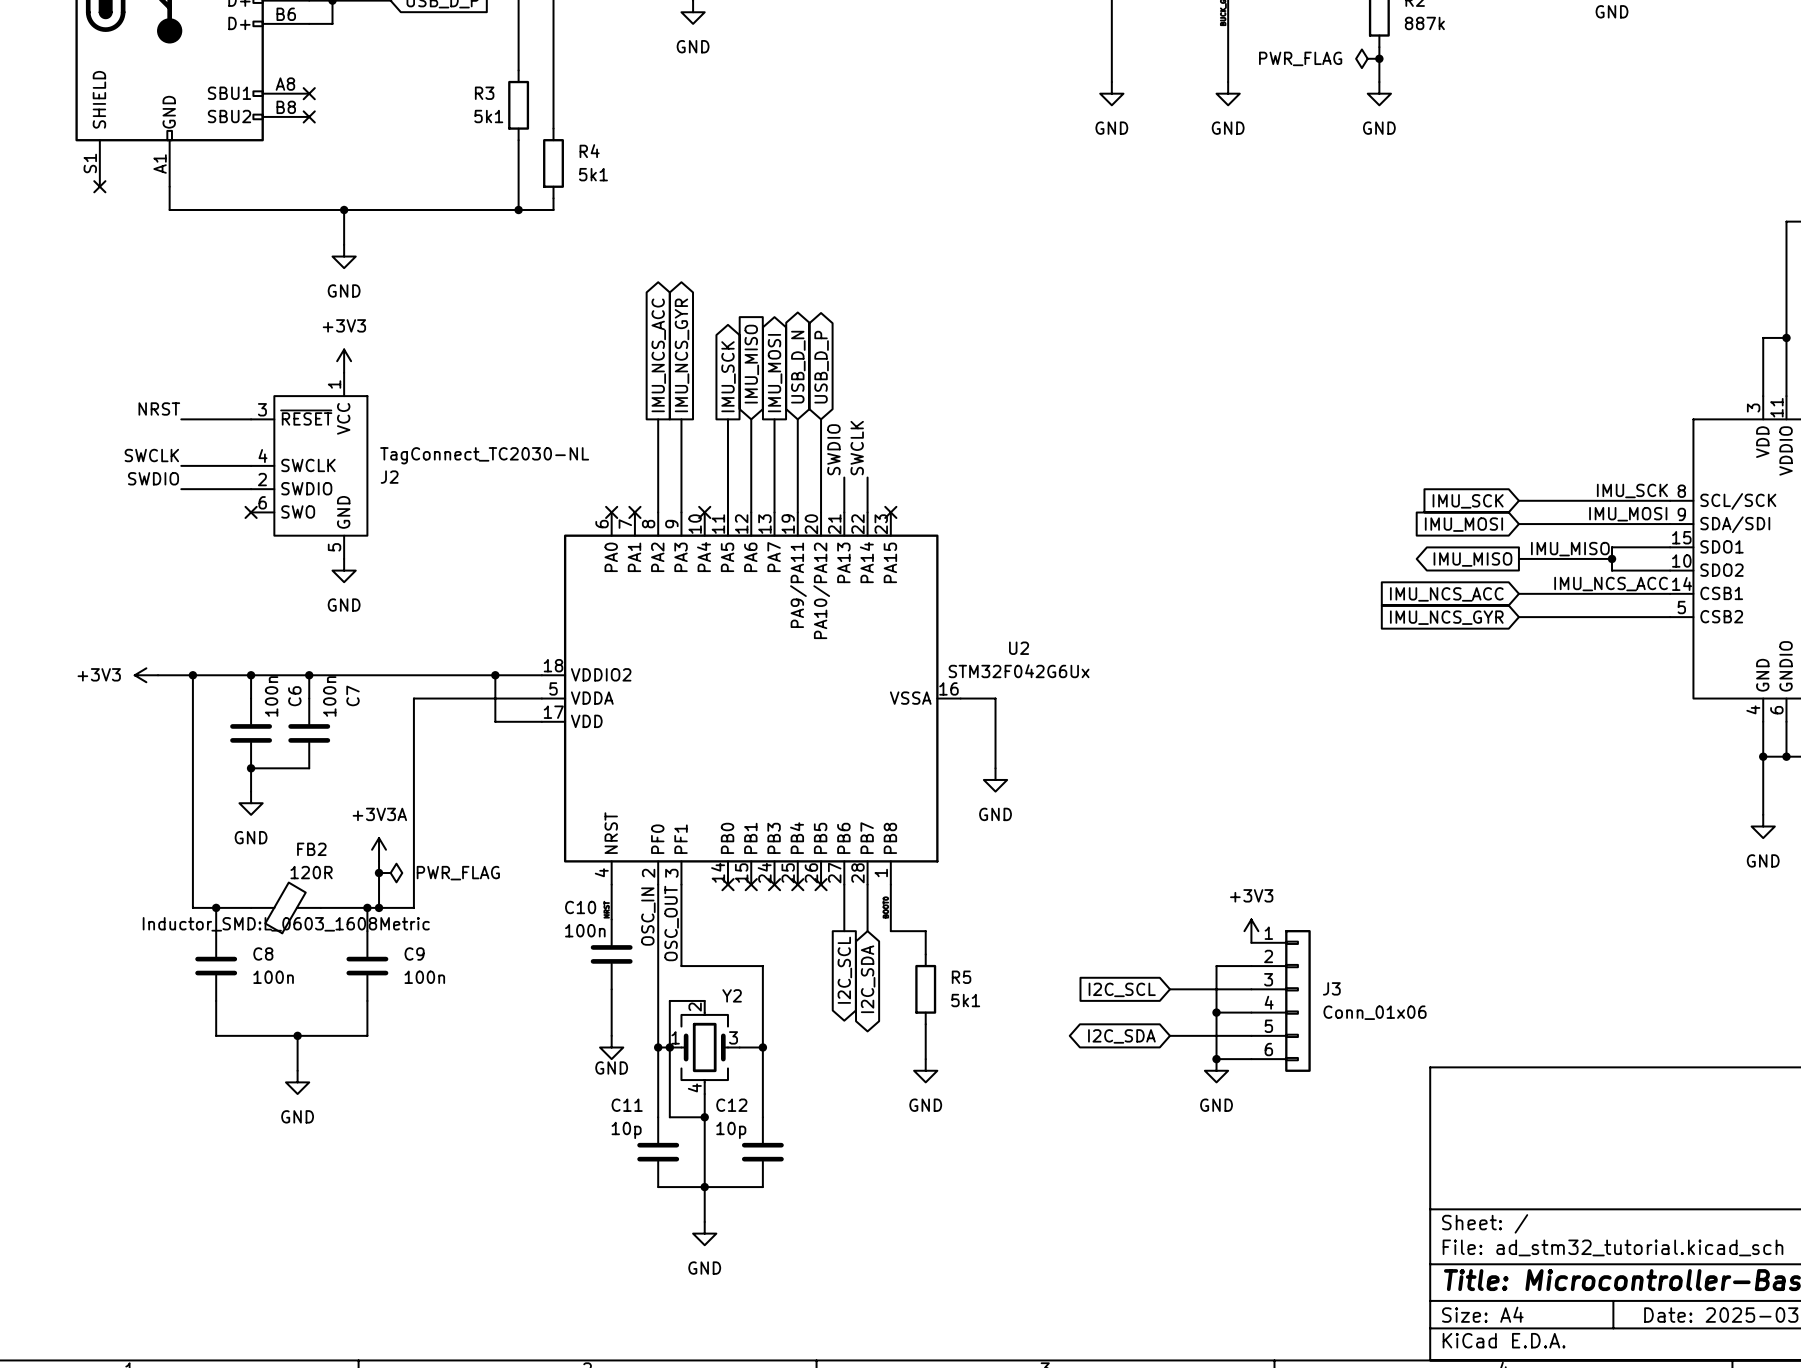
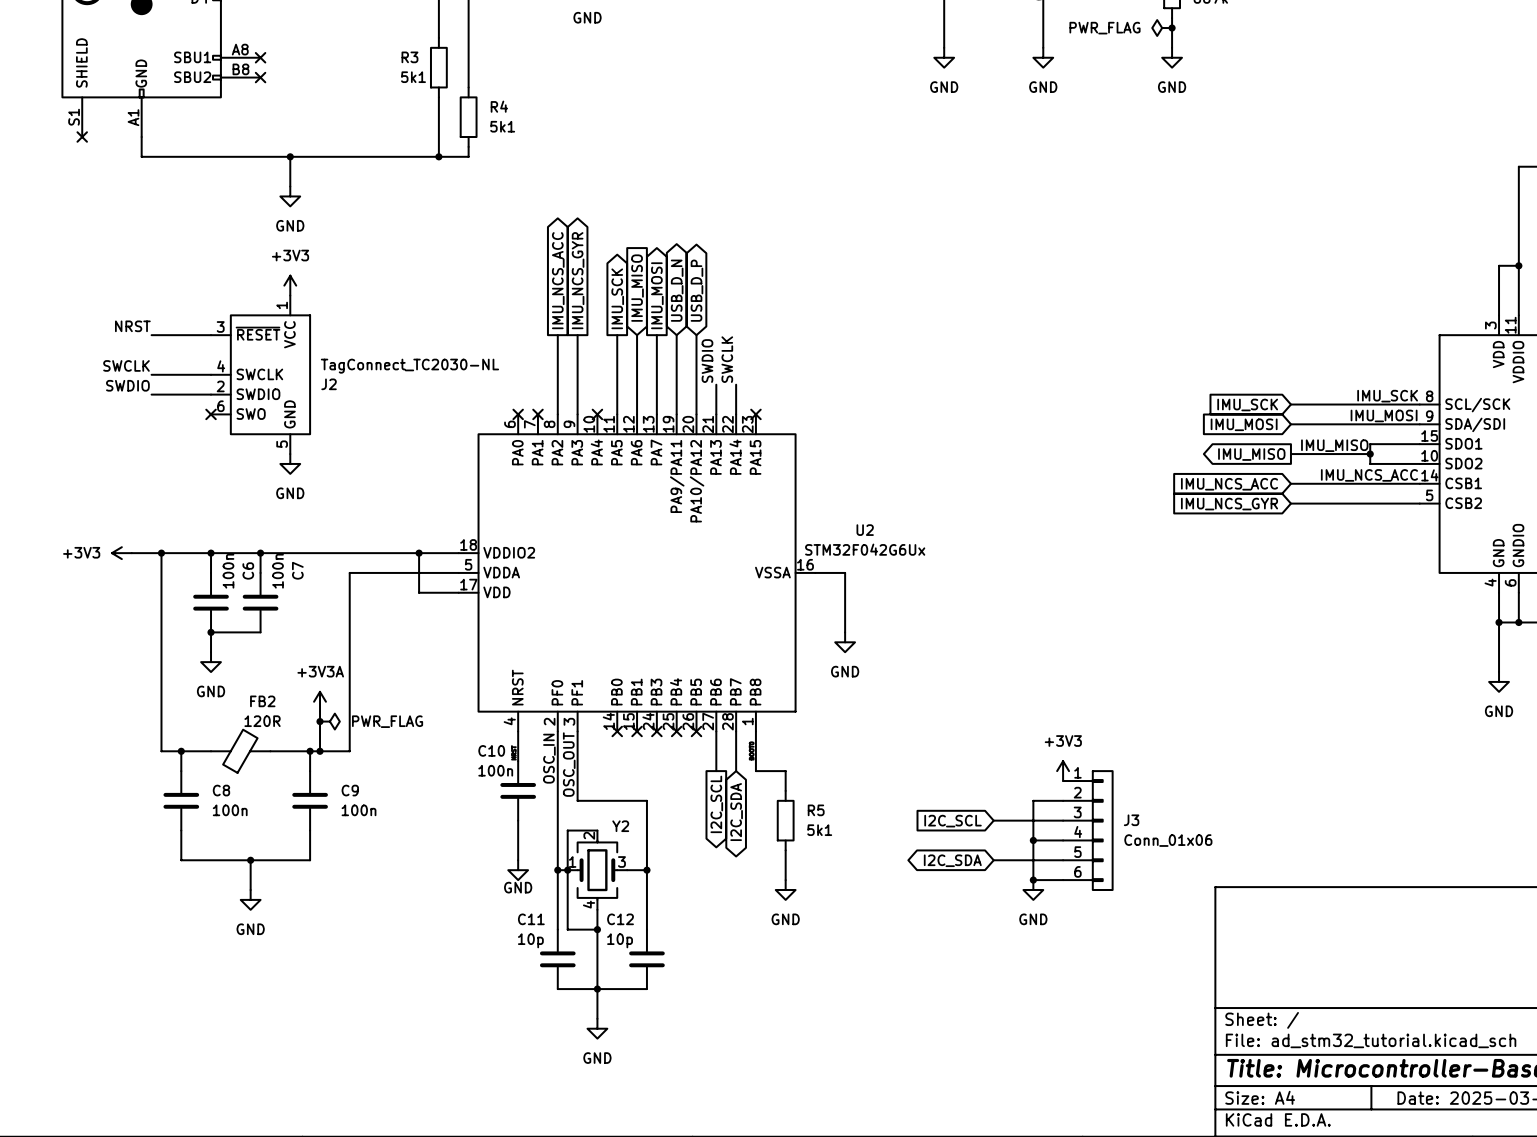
FB2 text: Inductor_SMD:L_0603_1608Metric (286, 924) -> none

